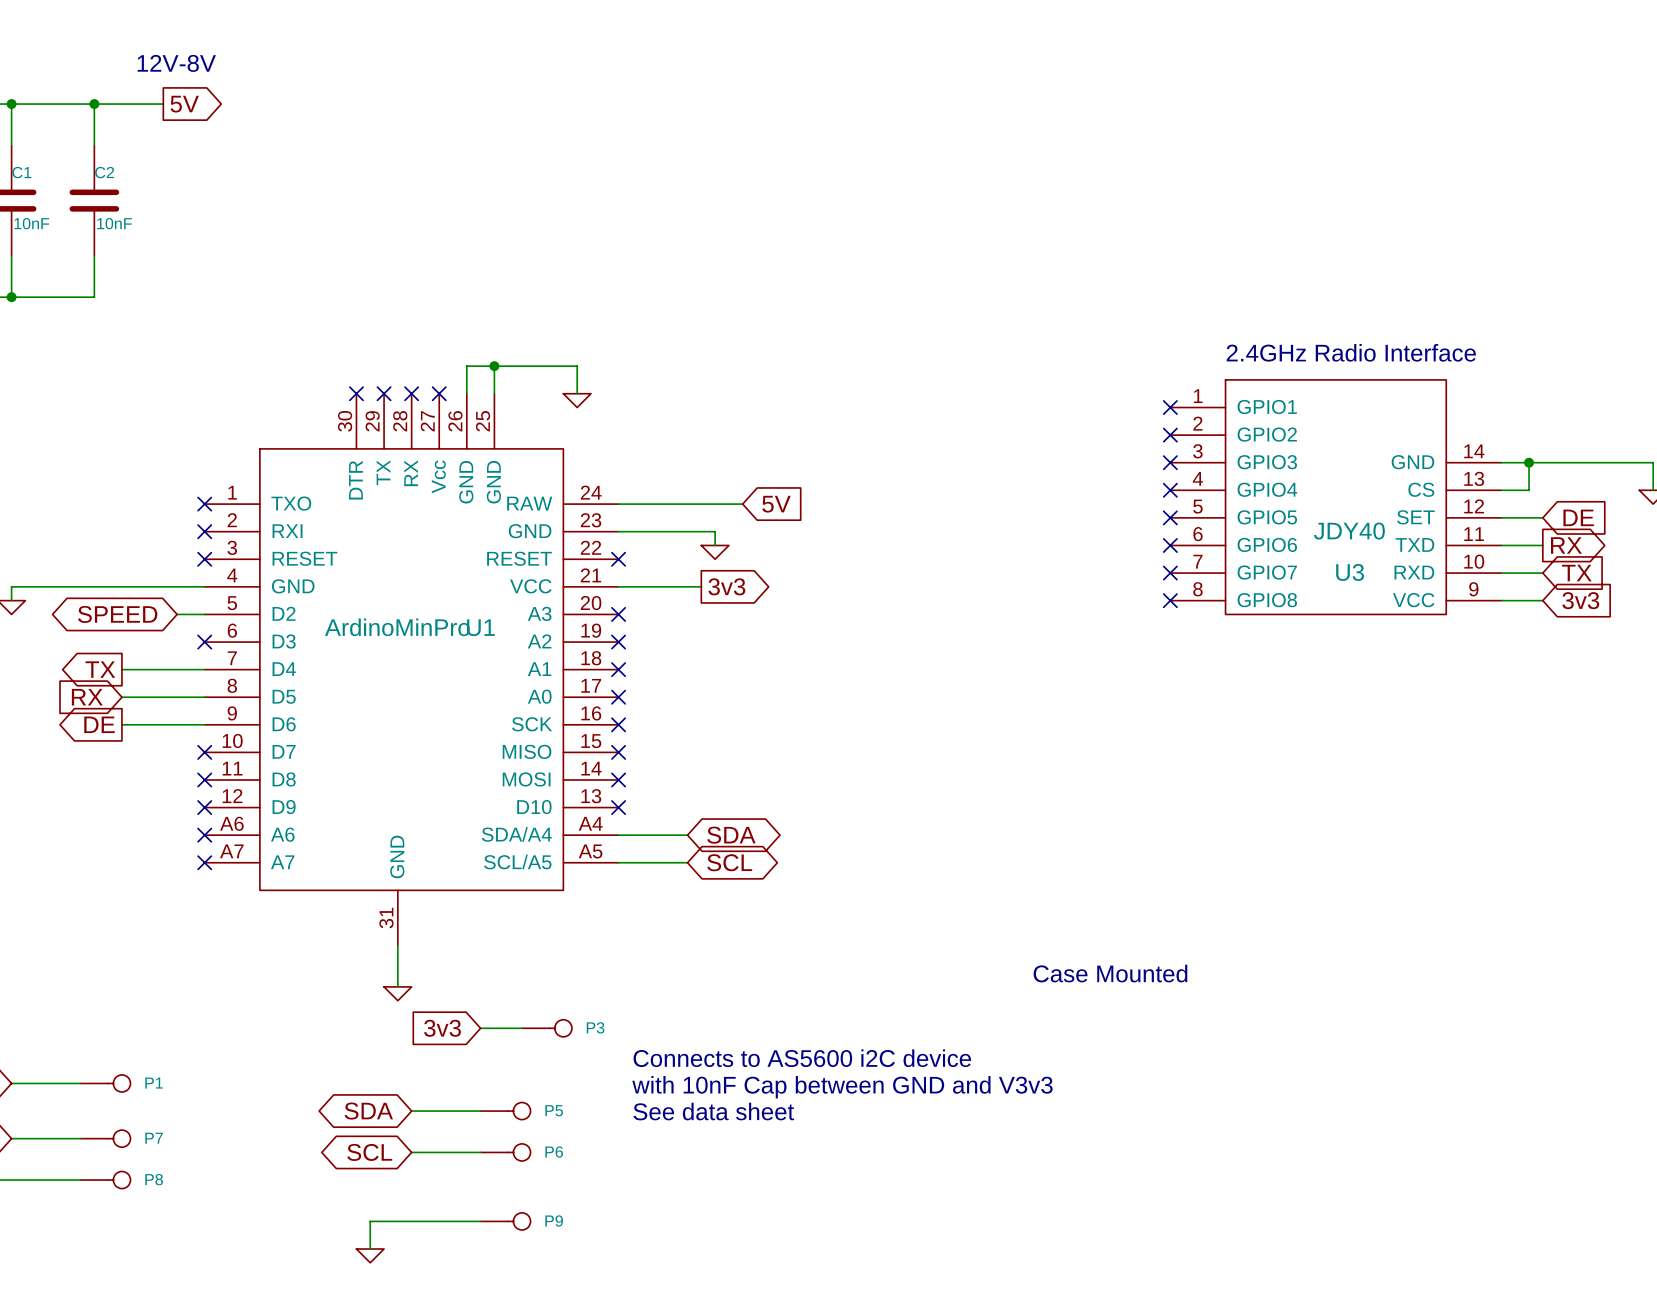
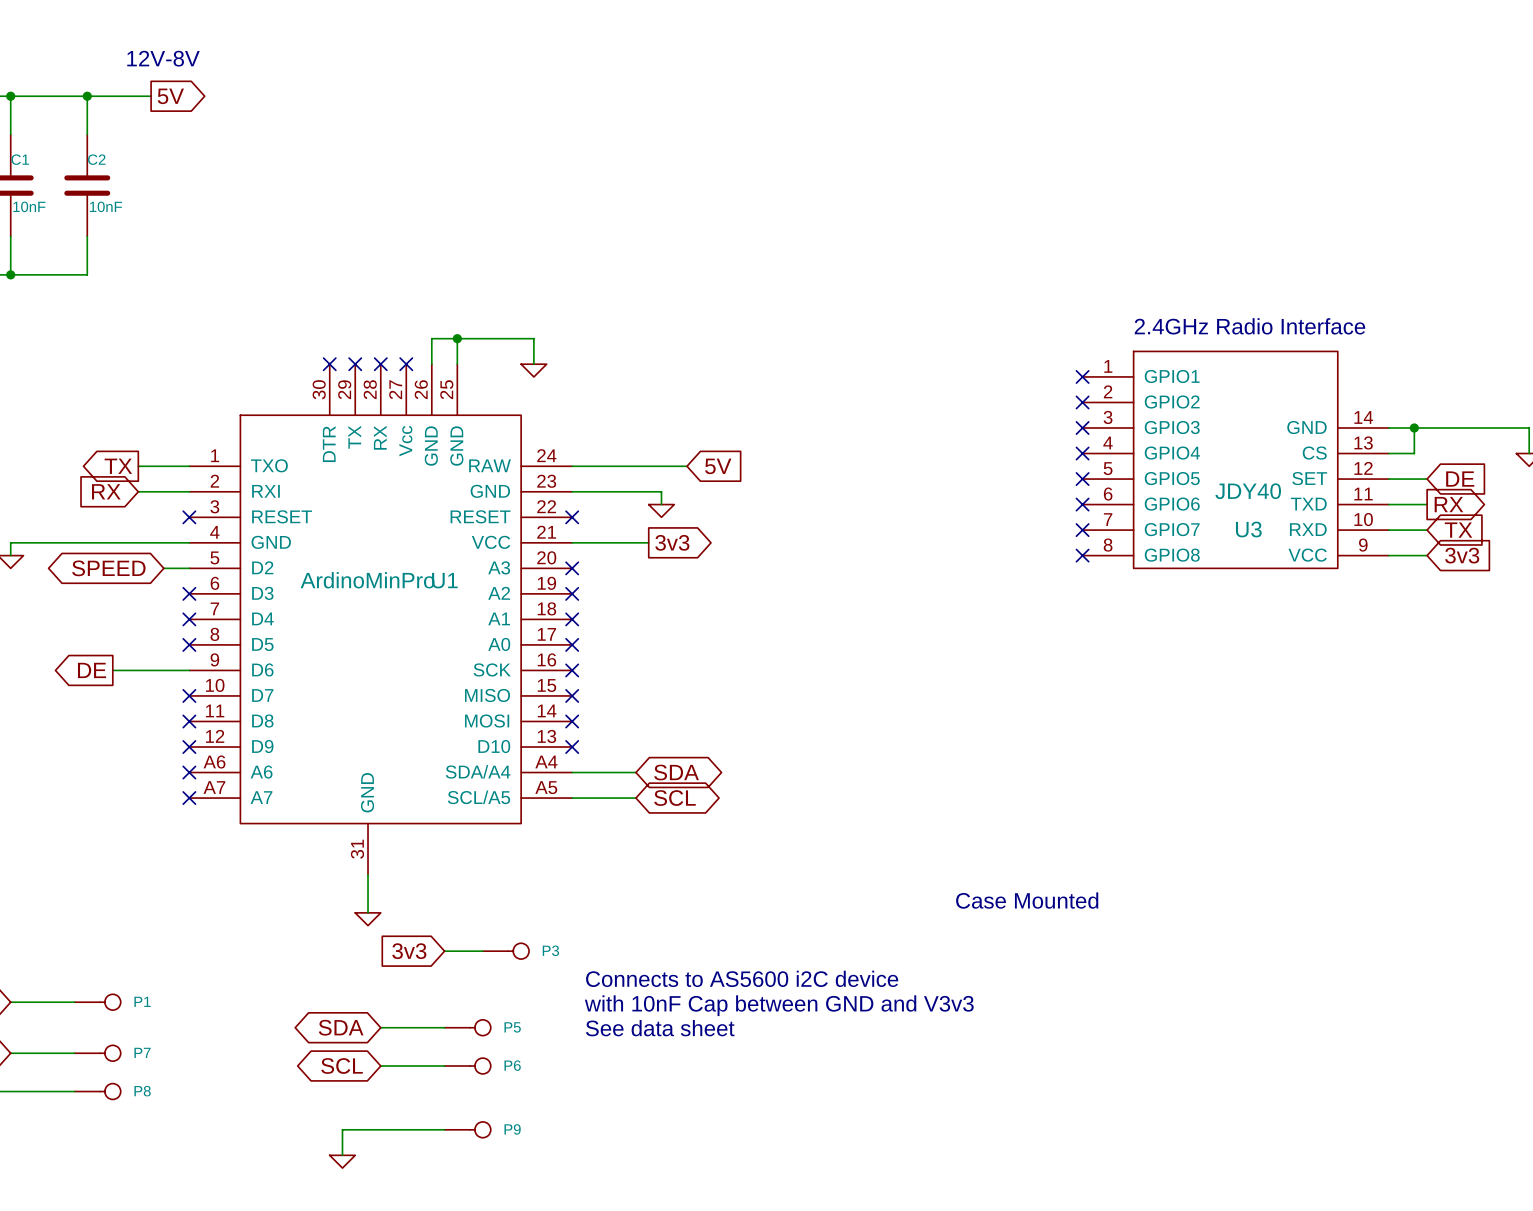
wire: none -> (138, 466) (189, 466)
no-connect mark: (204, 504) -> none
wire: none -> (138, 491) (189, 491)
no-connect mark: (204, 531) -> none
global label position: TX (100, 669) -> TX (118, 466)
wire: (121, 669) (204, 669) -> none
no-connect mark: none -> (189, 619)
global label position: RX (87, 697) -> RX (106, 491)
wire: (121, 697) (204, 697) -> none
no-connect mark: none -> (189, 644)

